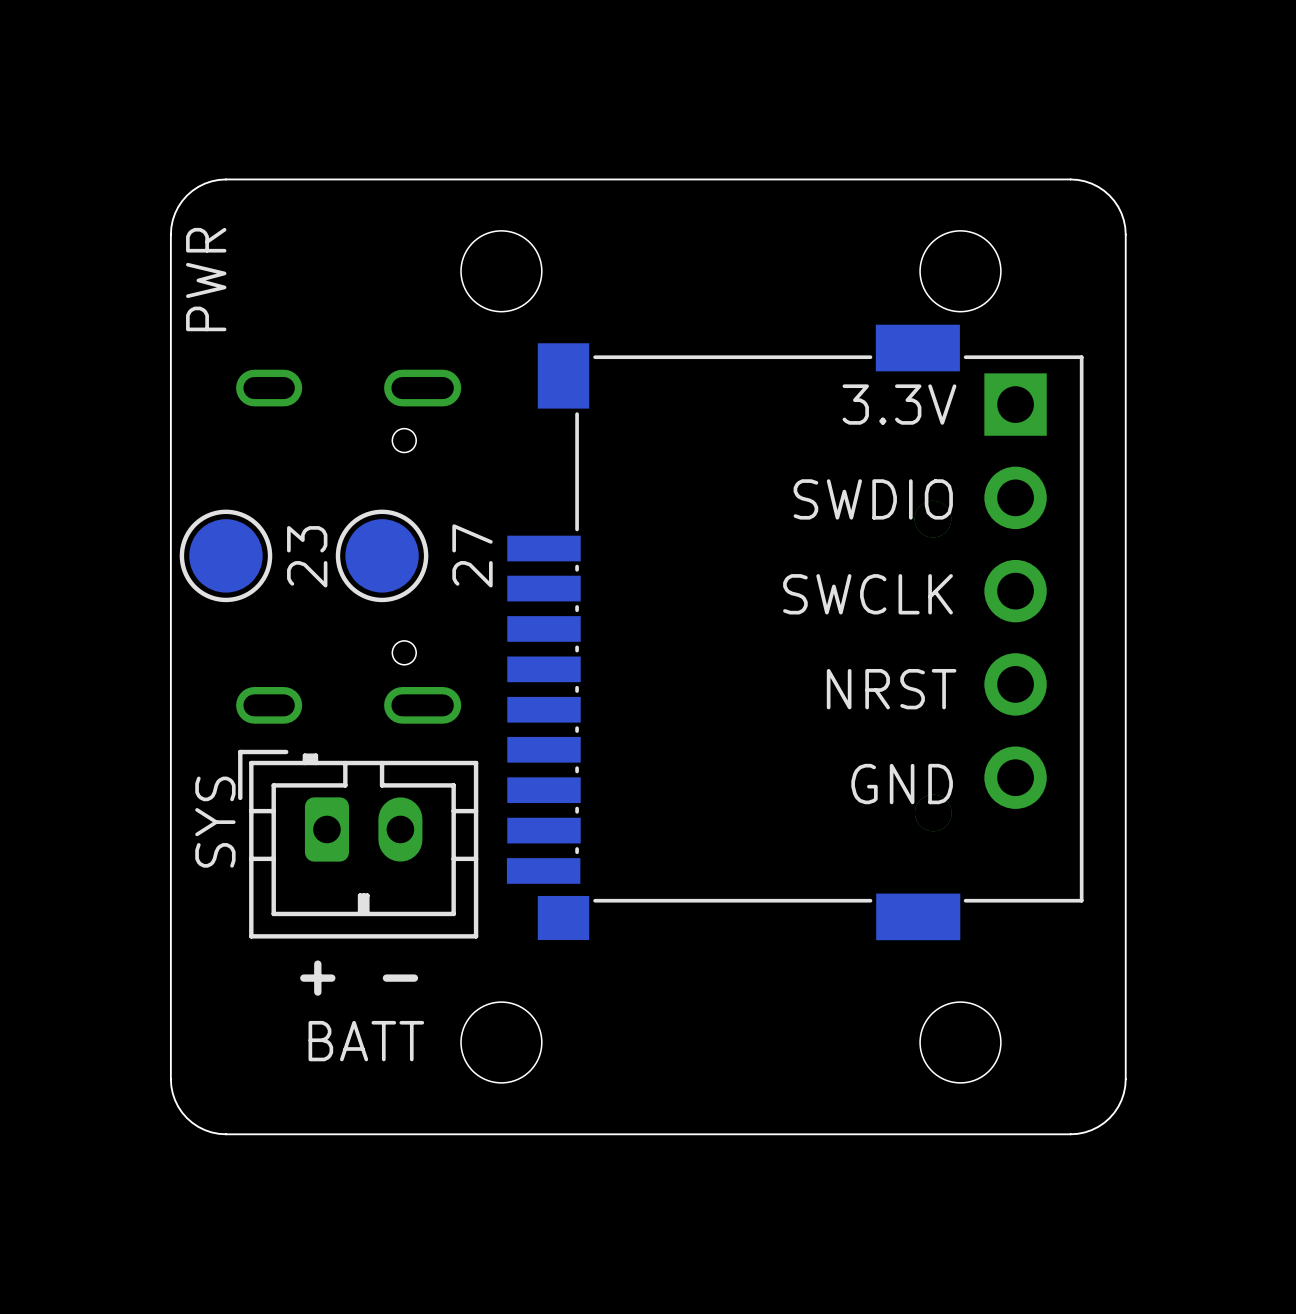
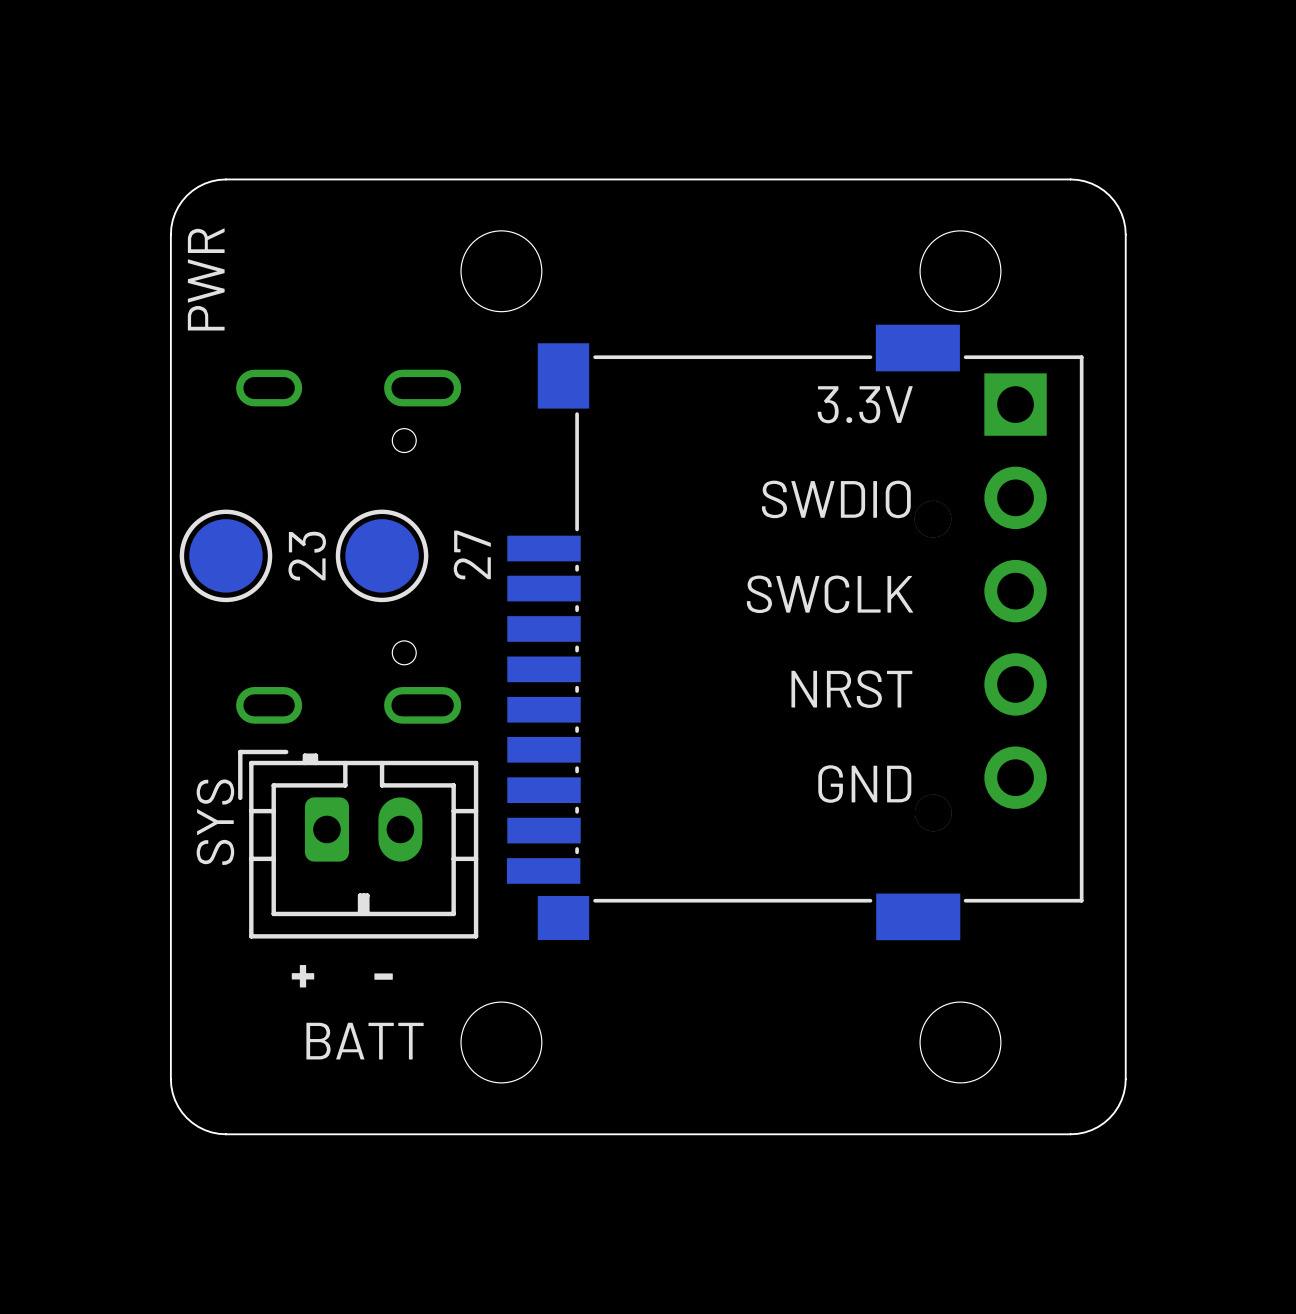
text position: 3.3V (899, 404) -> 3.3V (865, 404)
text position: SWDIO (873, 499) -> SWDIO (836, 499)
text position: SWCLK (867, 594) -> SWCLK (830, 594)
text position: NRST (891, 689) -> NRST (851, 689)
text position: GND (902, 784) -> GND (864, 784)

